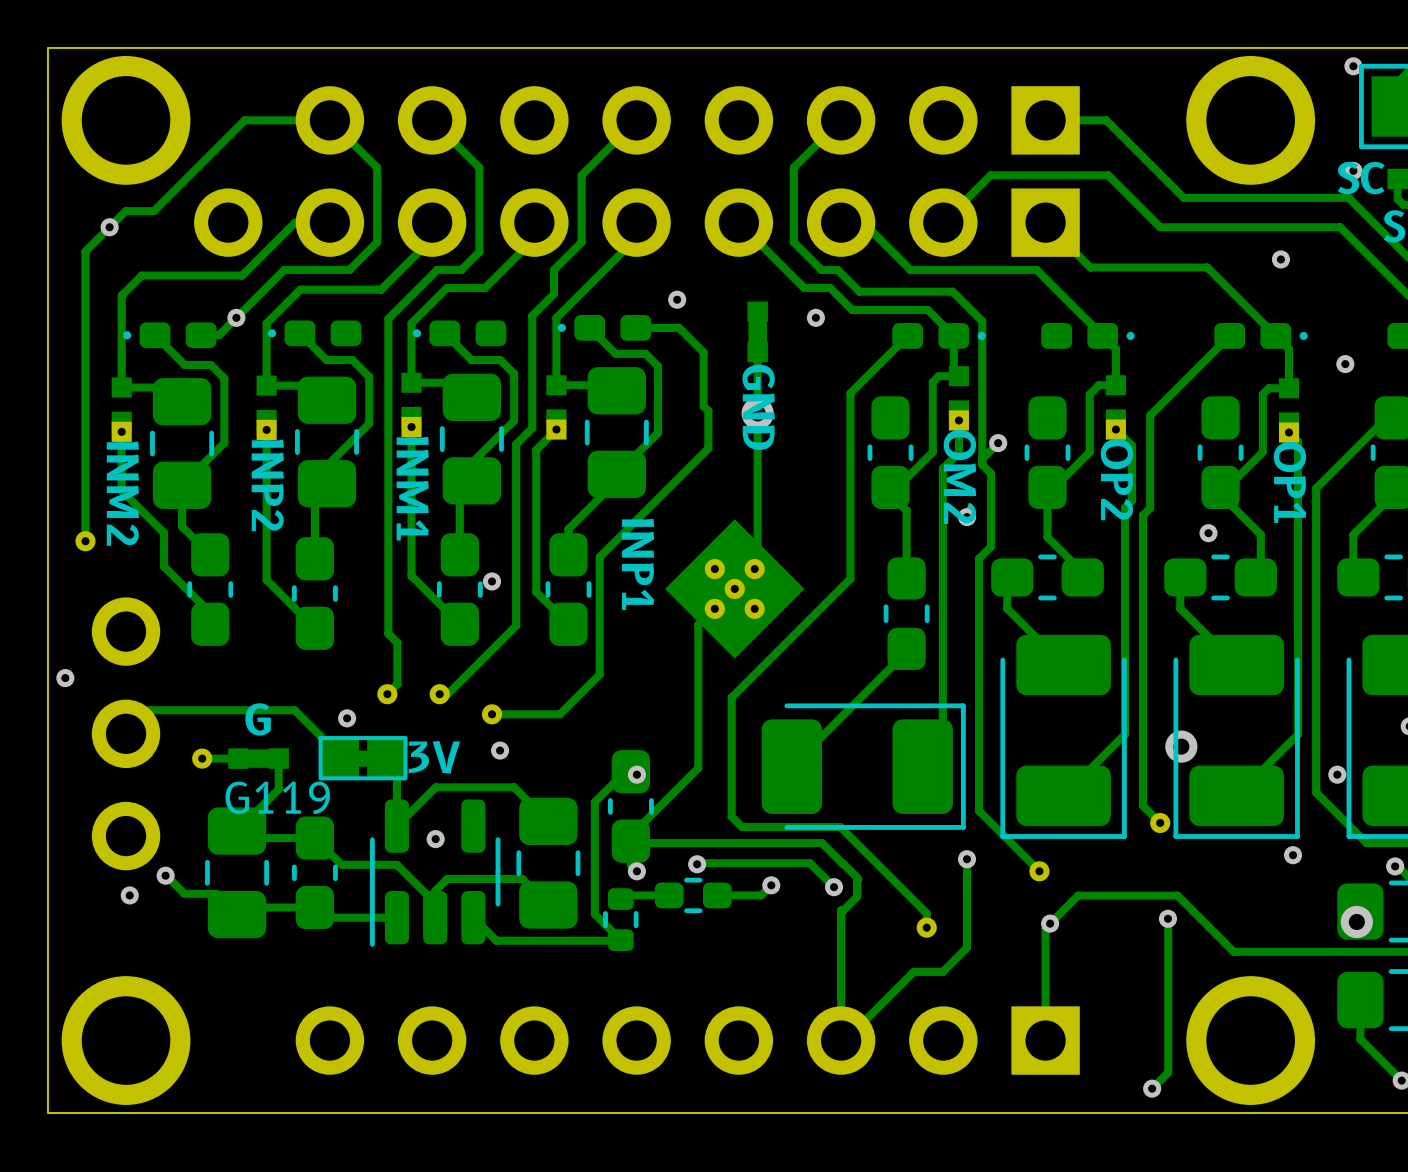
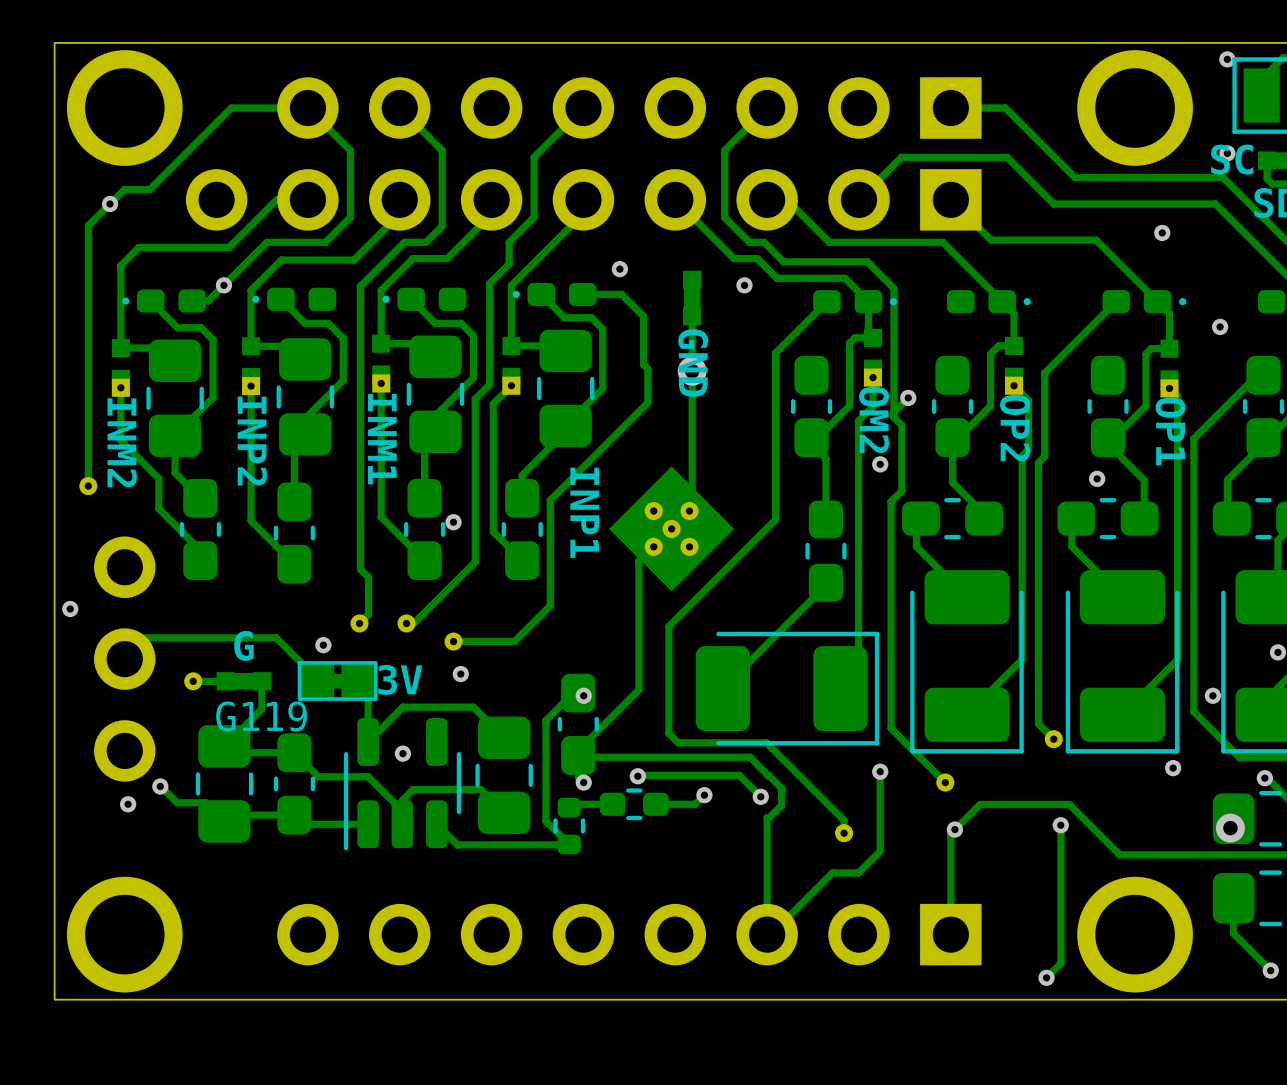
via: (1181, 746) -> none

